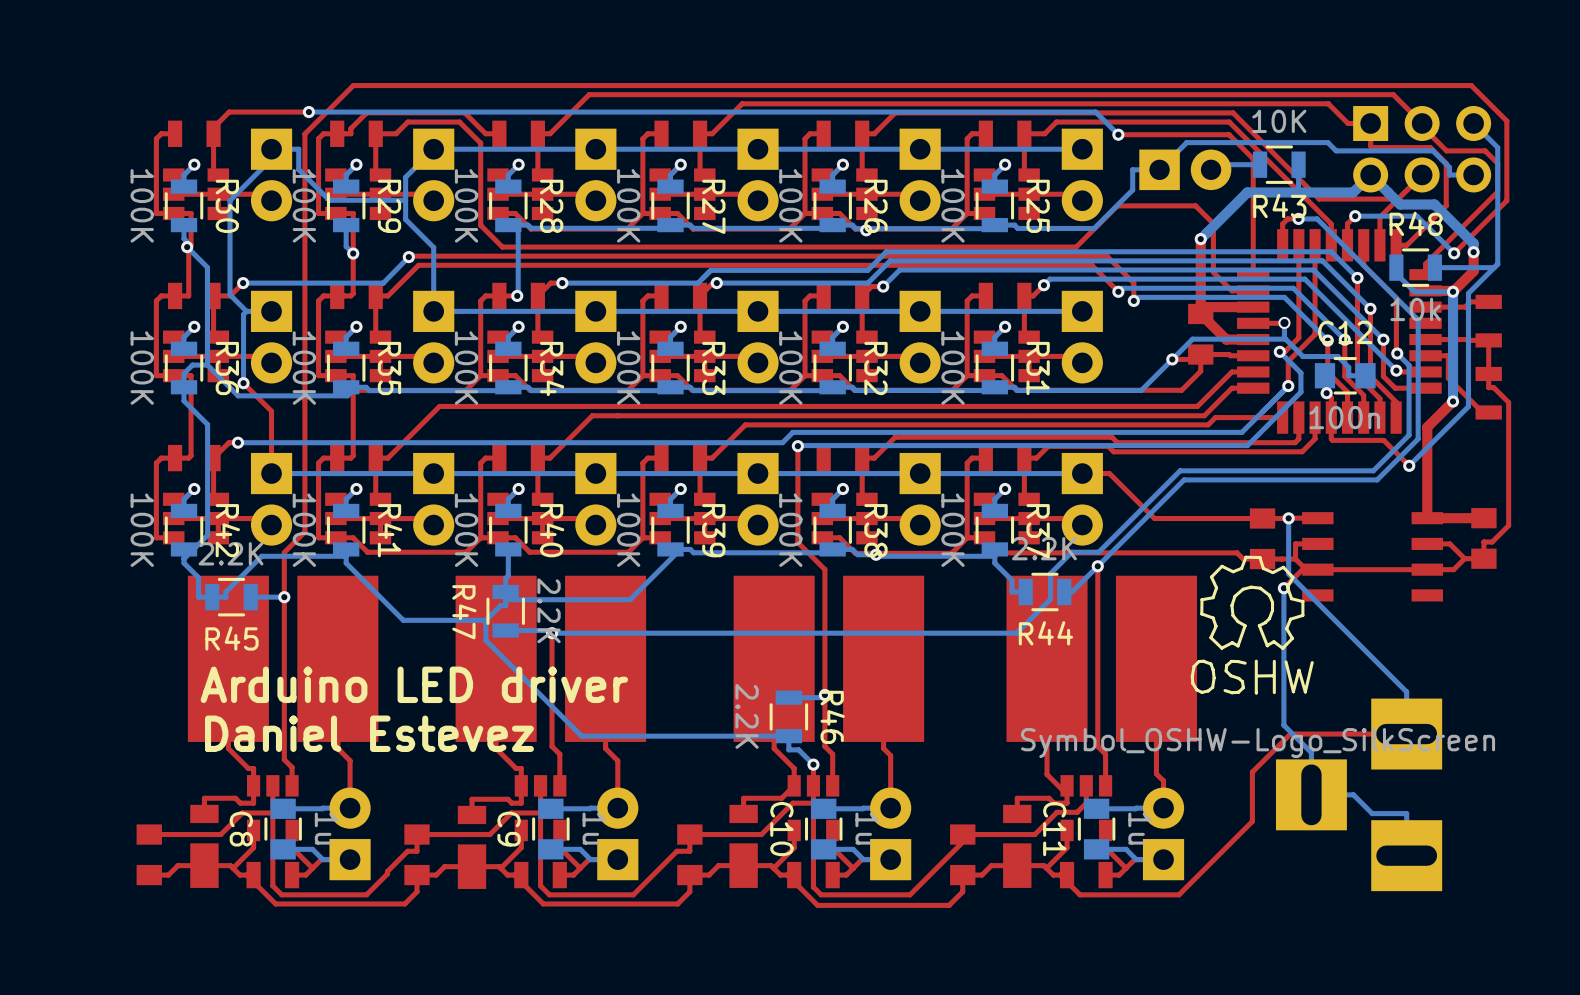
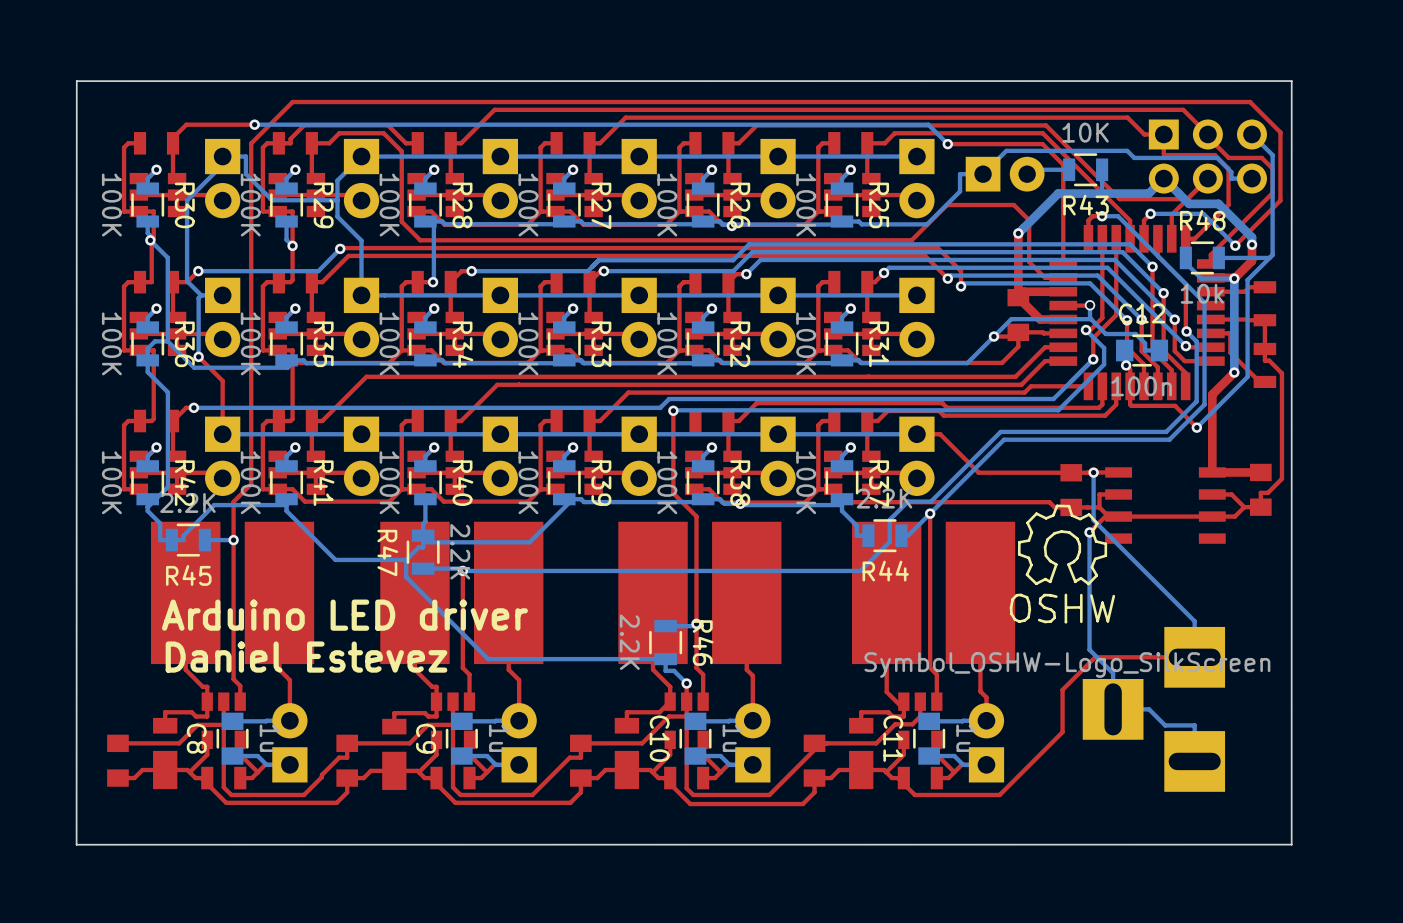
board edge: none -> (1291, 81) (1291, 844) (76, 844) (76, 81) (1291, 81)

